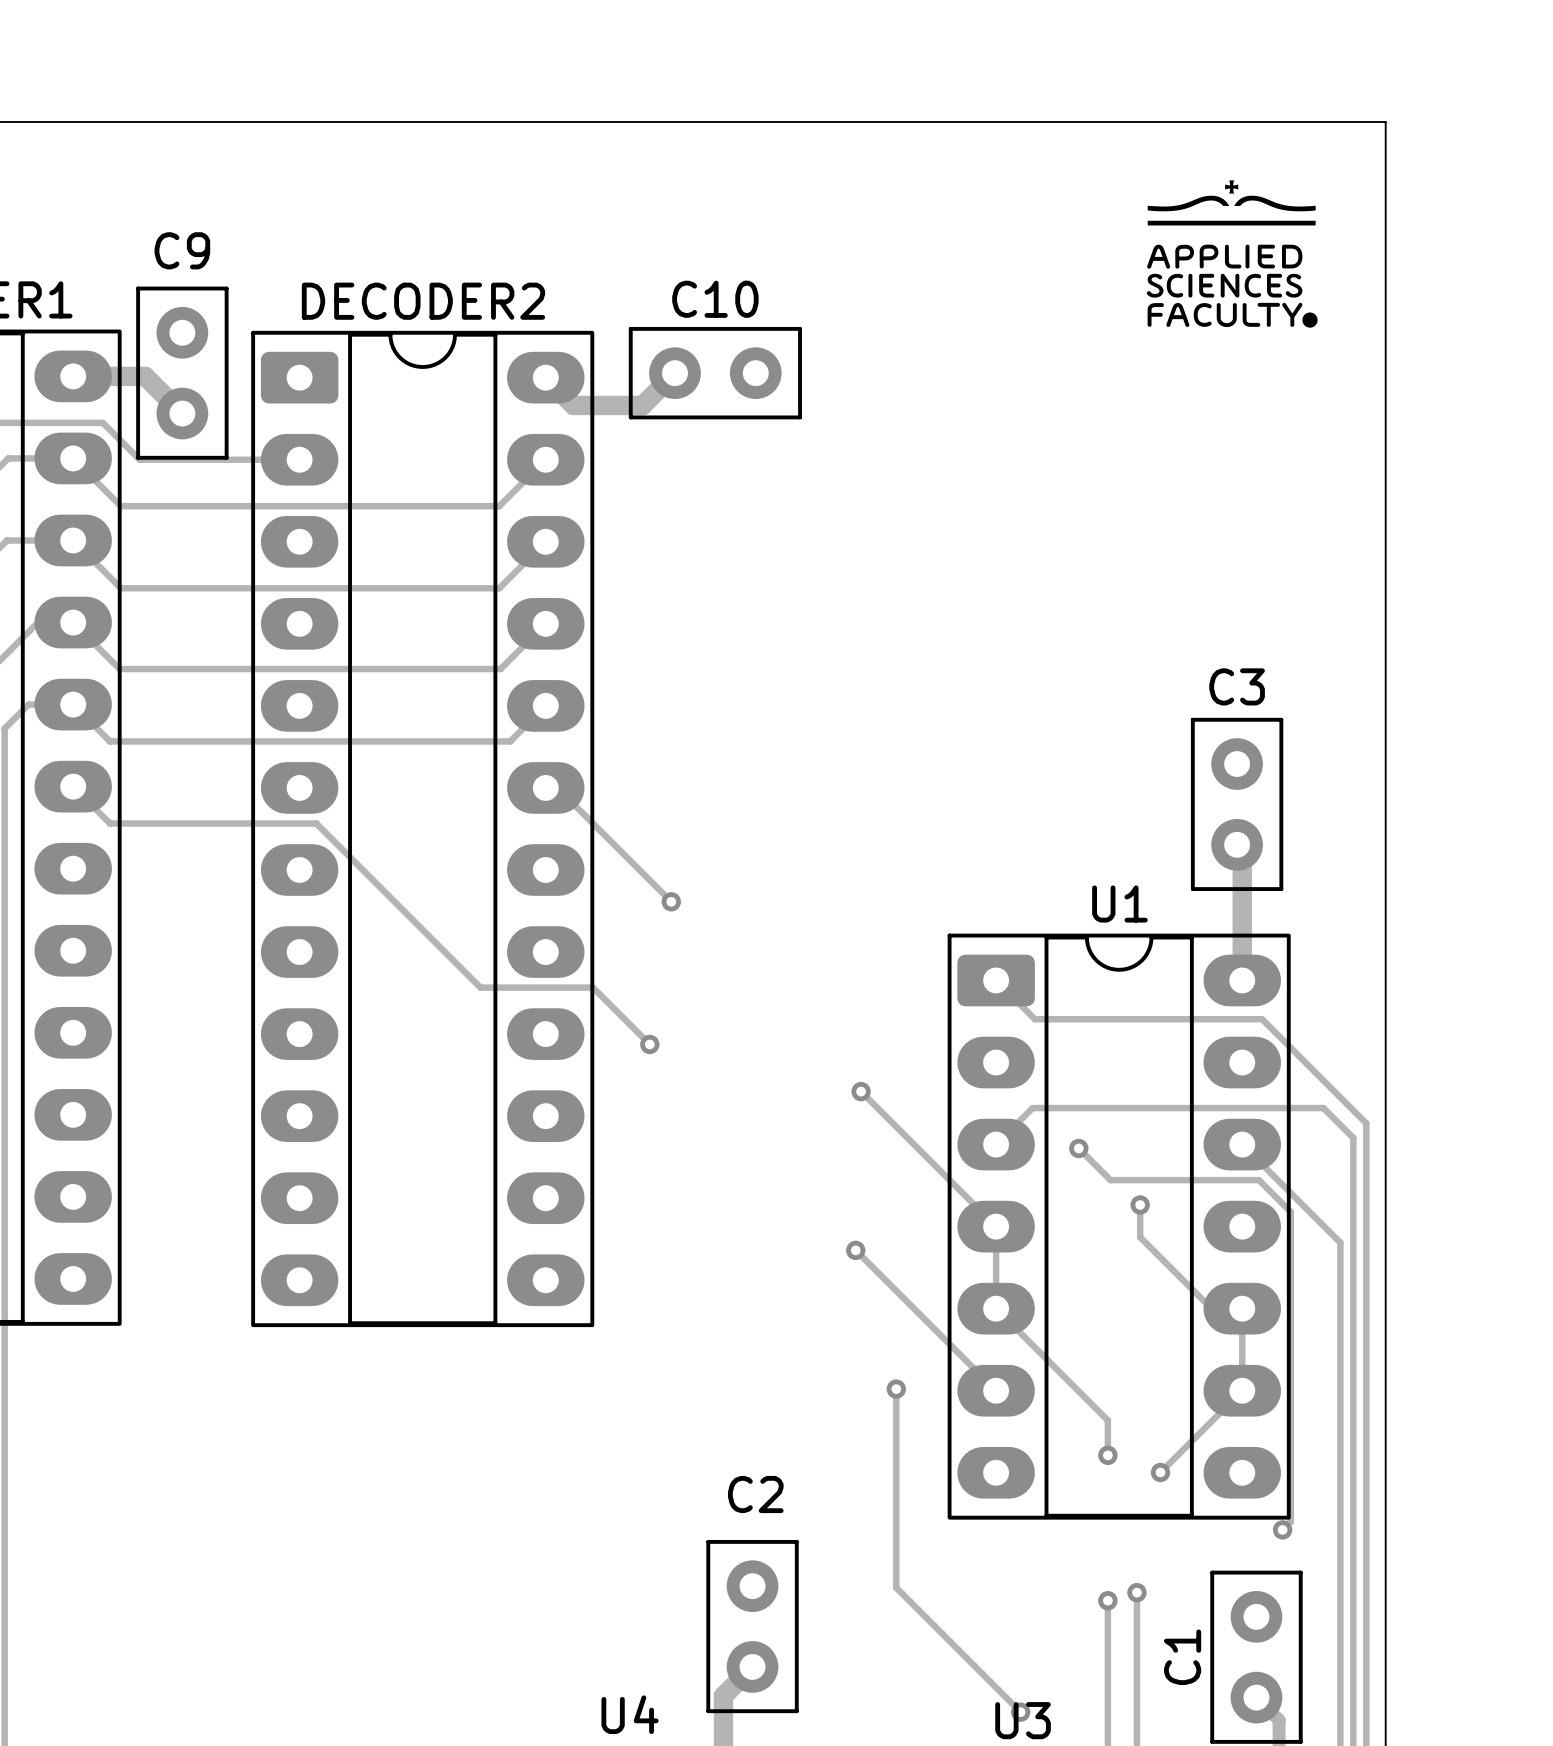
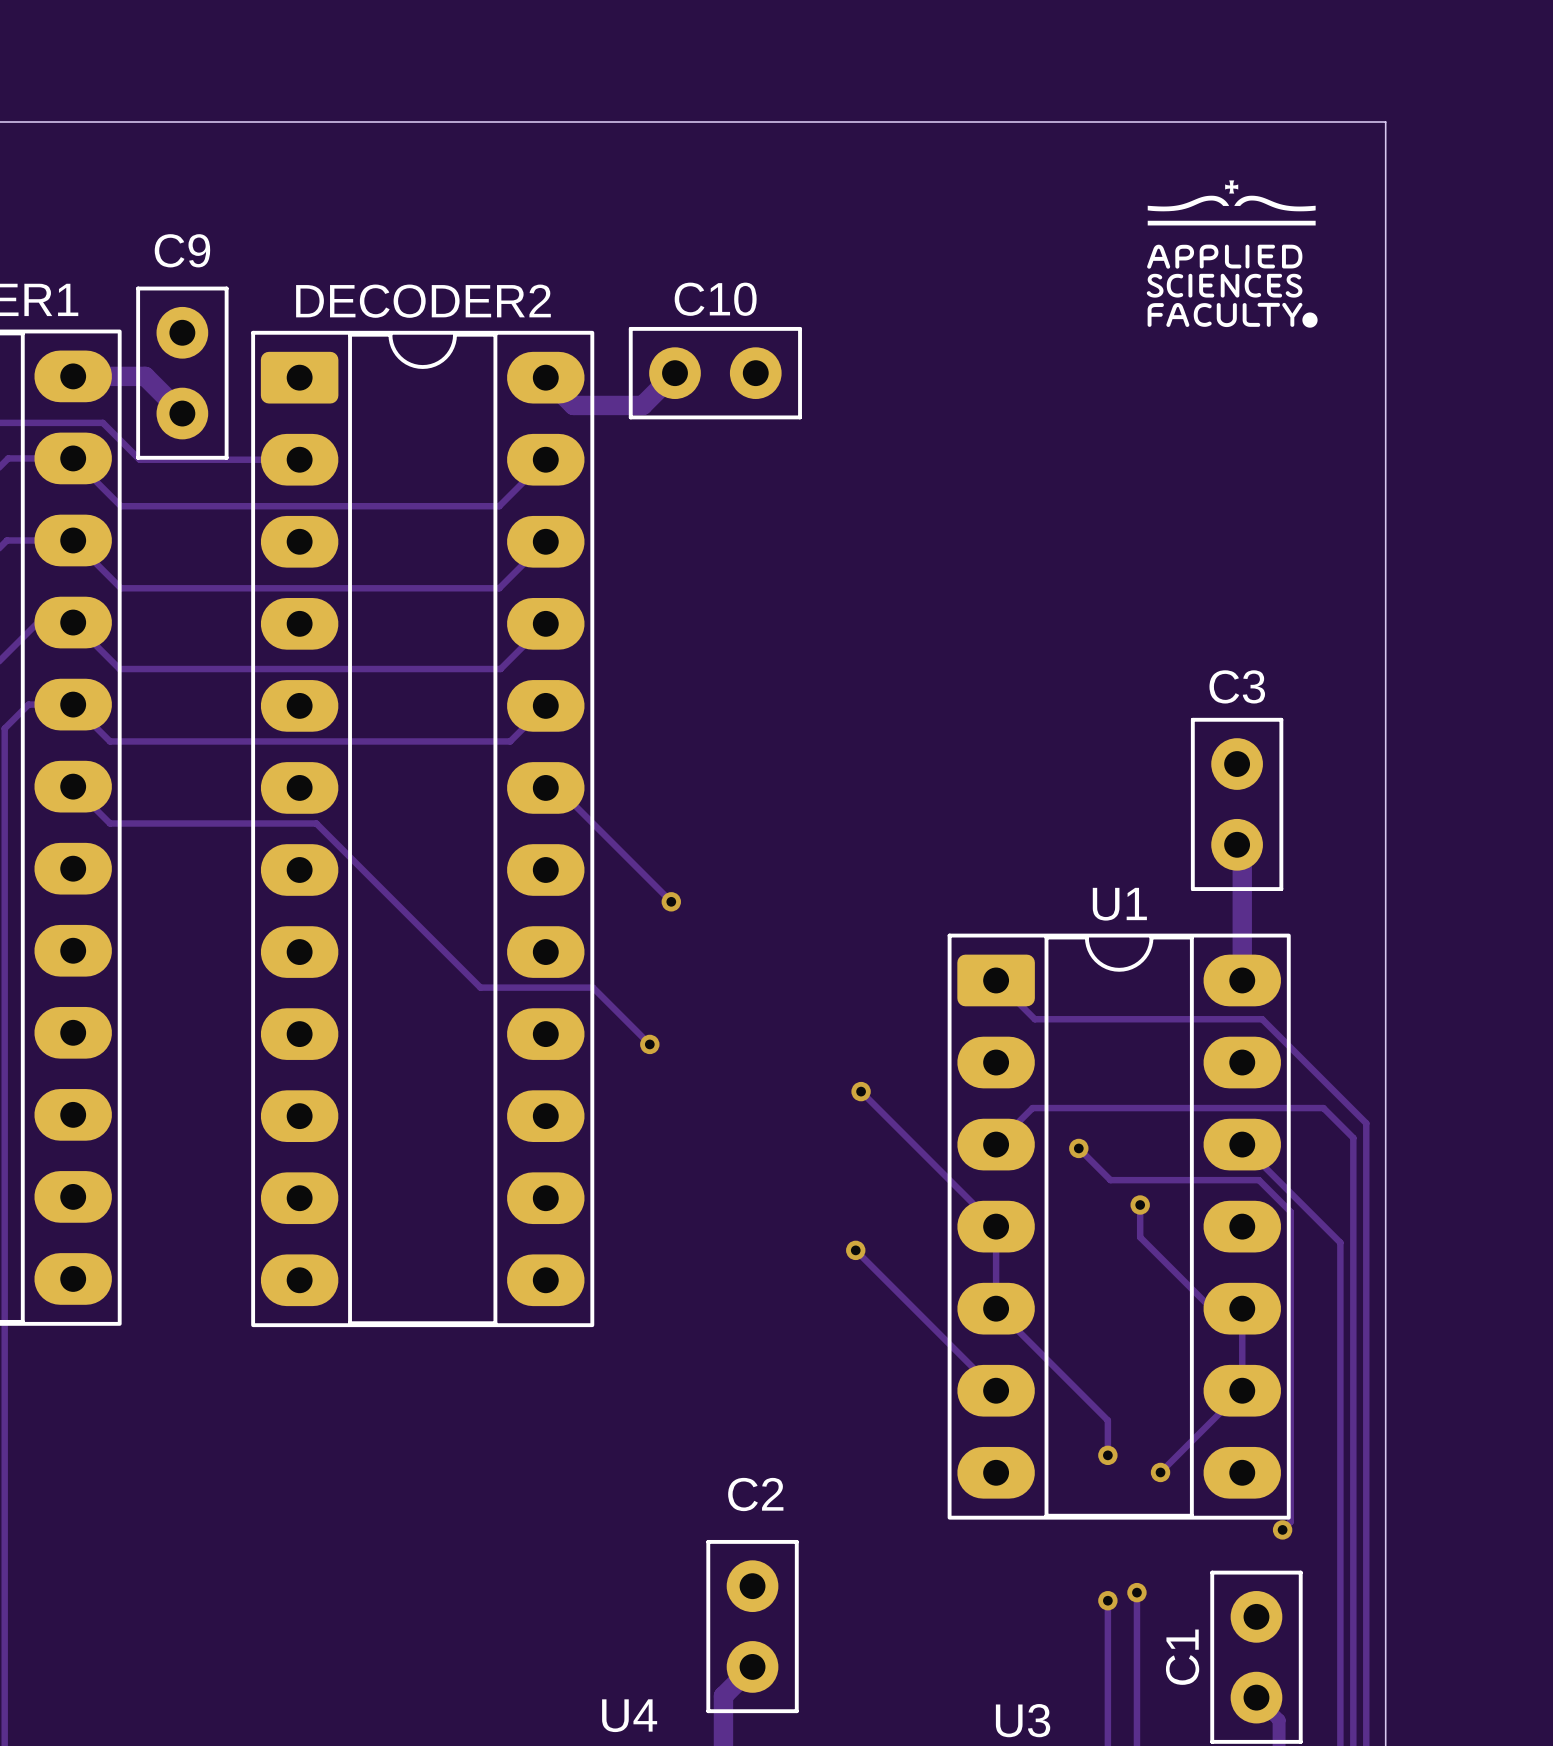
track: (896, 1389) (896, 1587) (1020, 1712) -> none
via: (896, 1389) -> none
via: (1020, 1712) -> none

